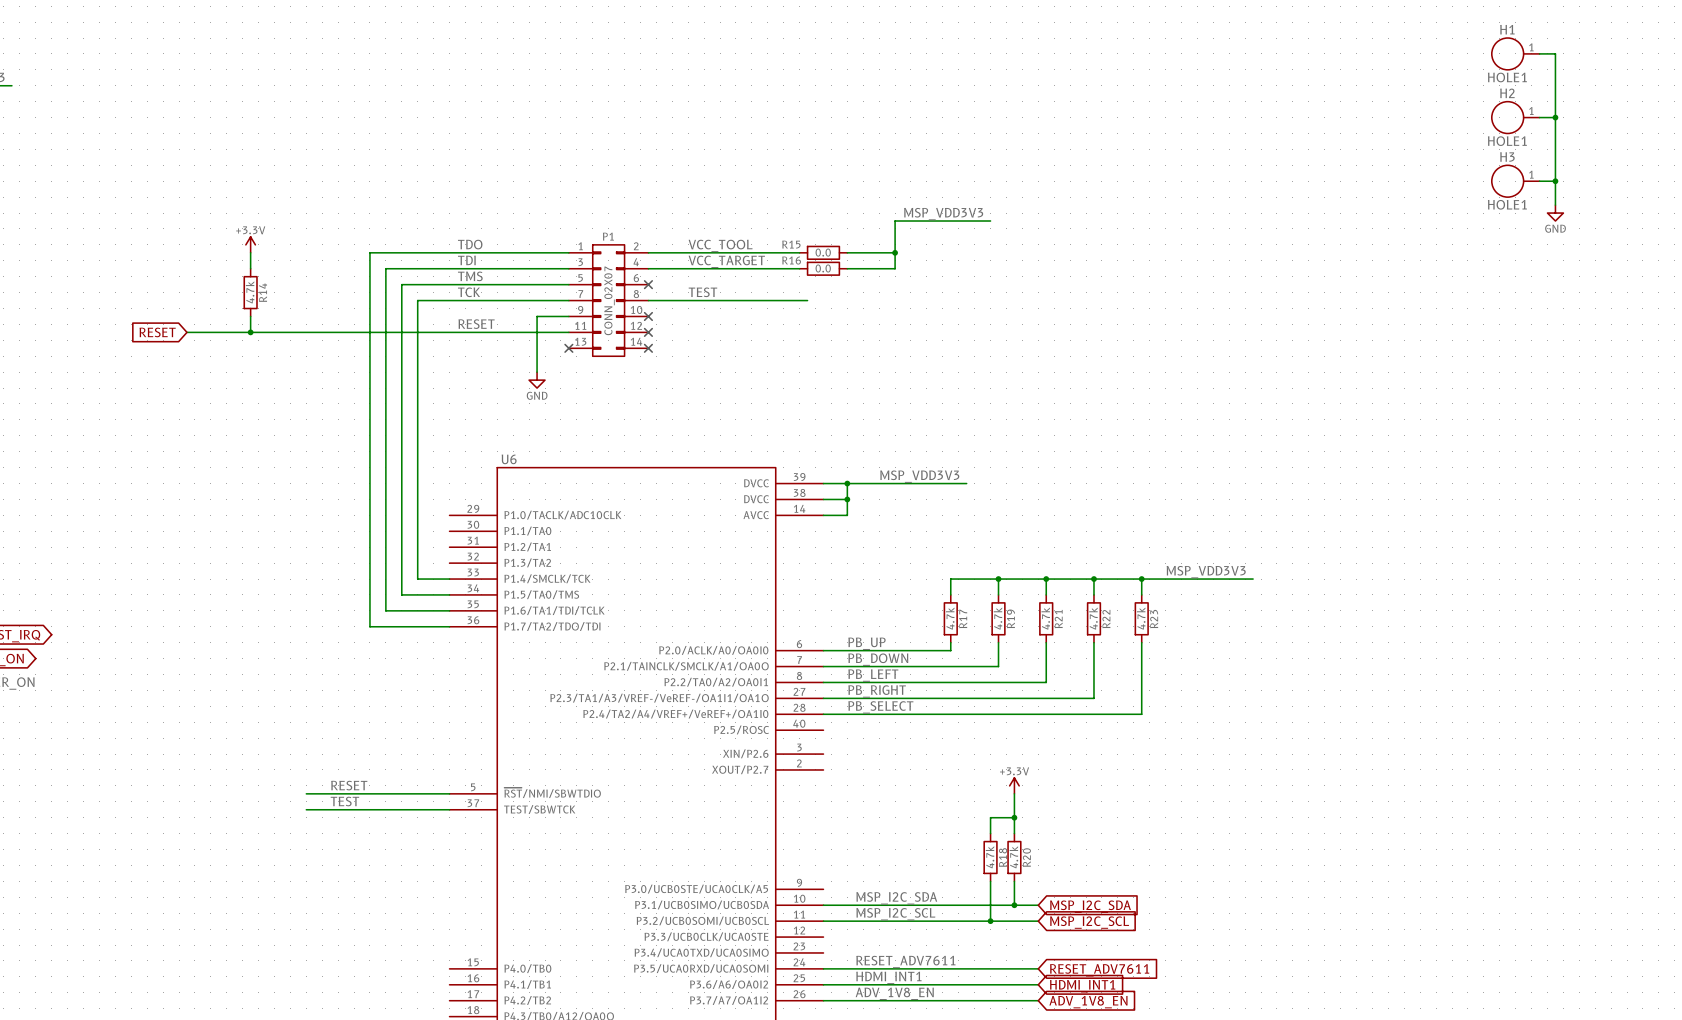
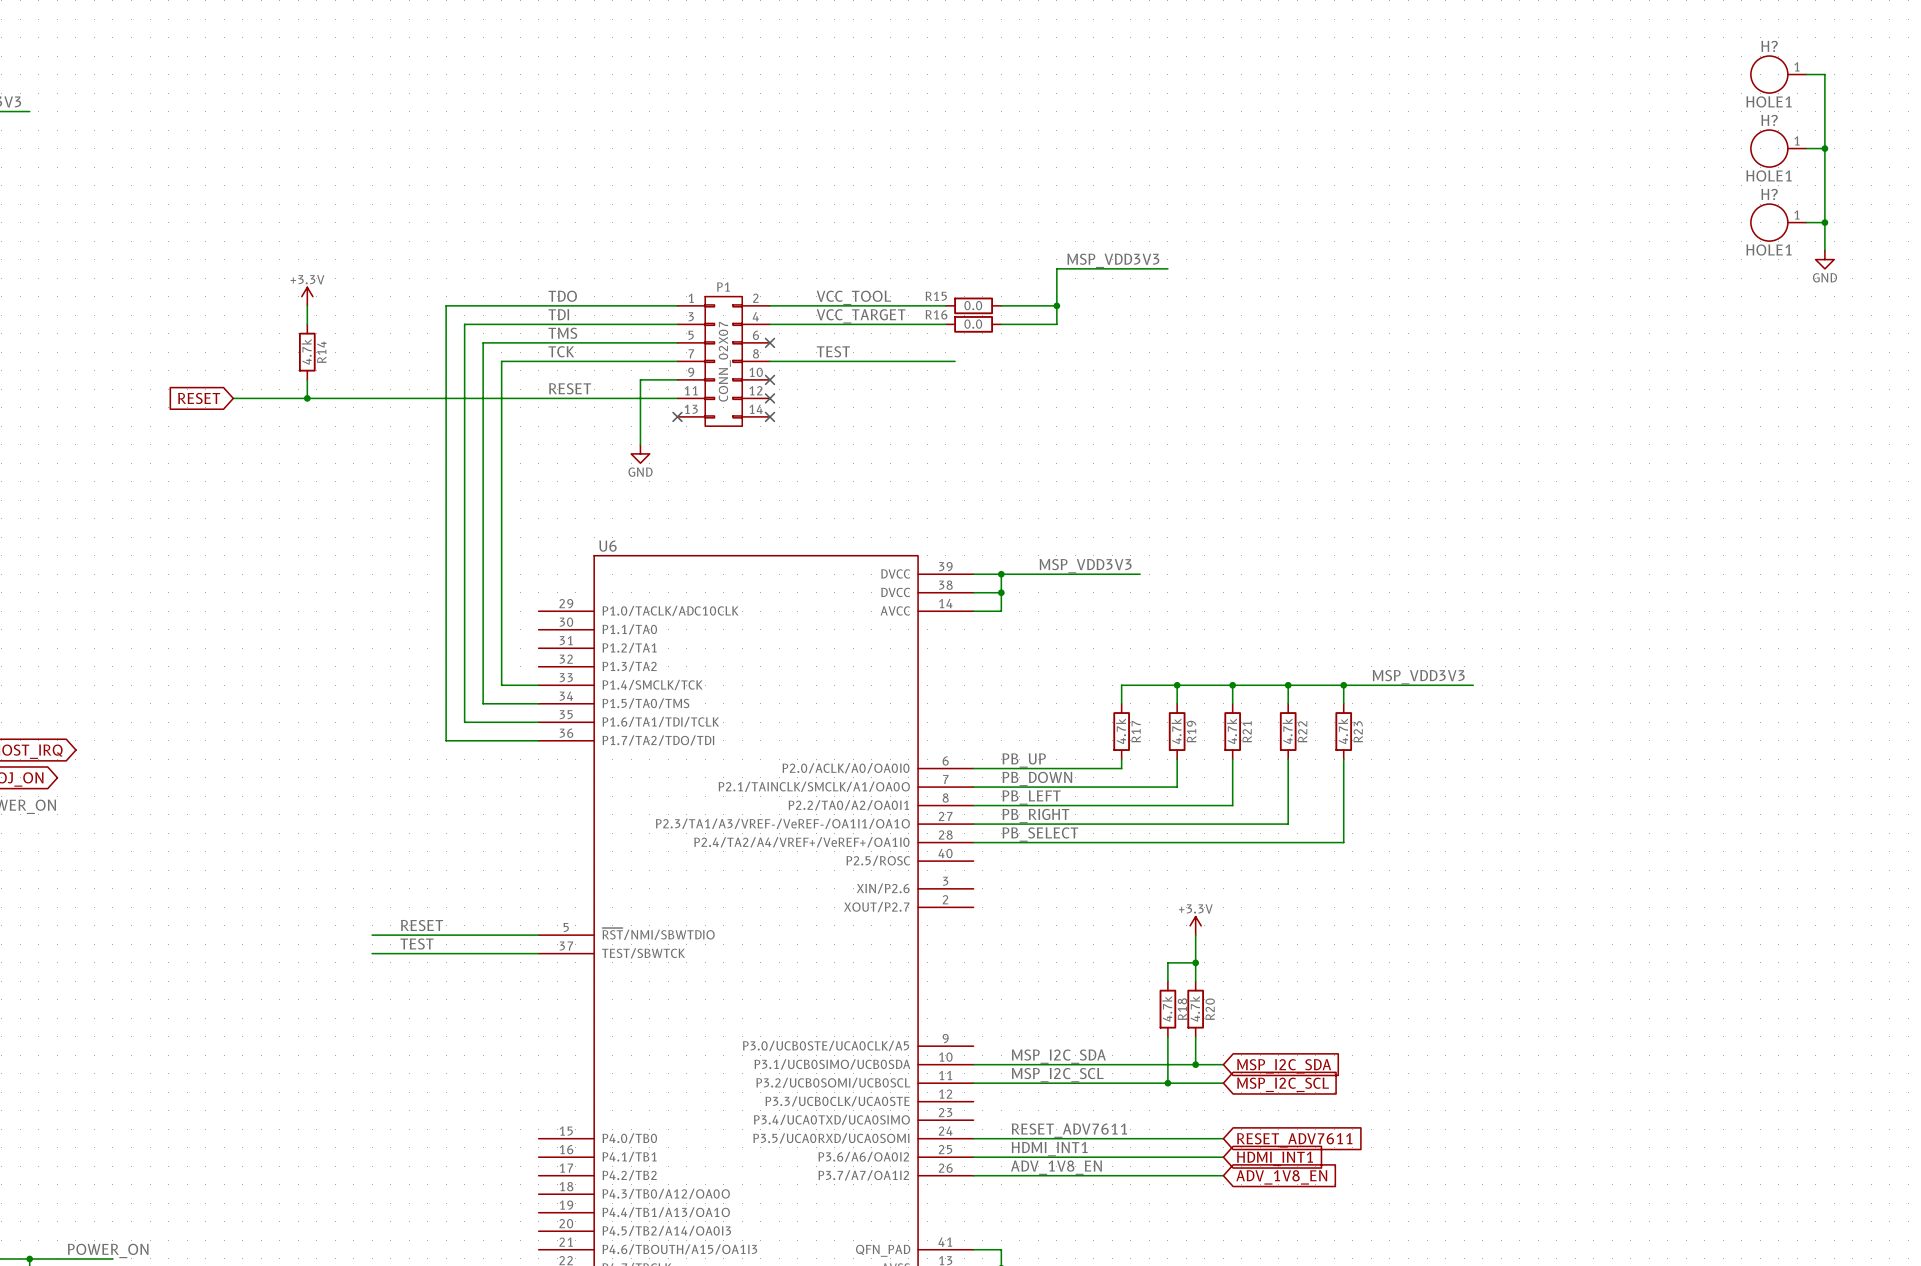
H1 name: H1 (1507, 29) -> H? (1769, 46)
H2 name: H2 (1507, 93) -> H? (1769, 120)
H3 name: H3 (1507, 156) -> H? (1769, 194)

